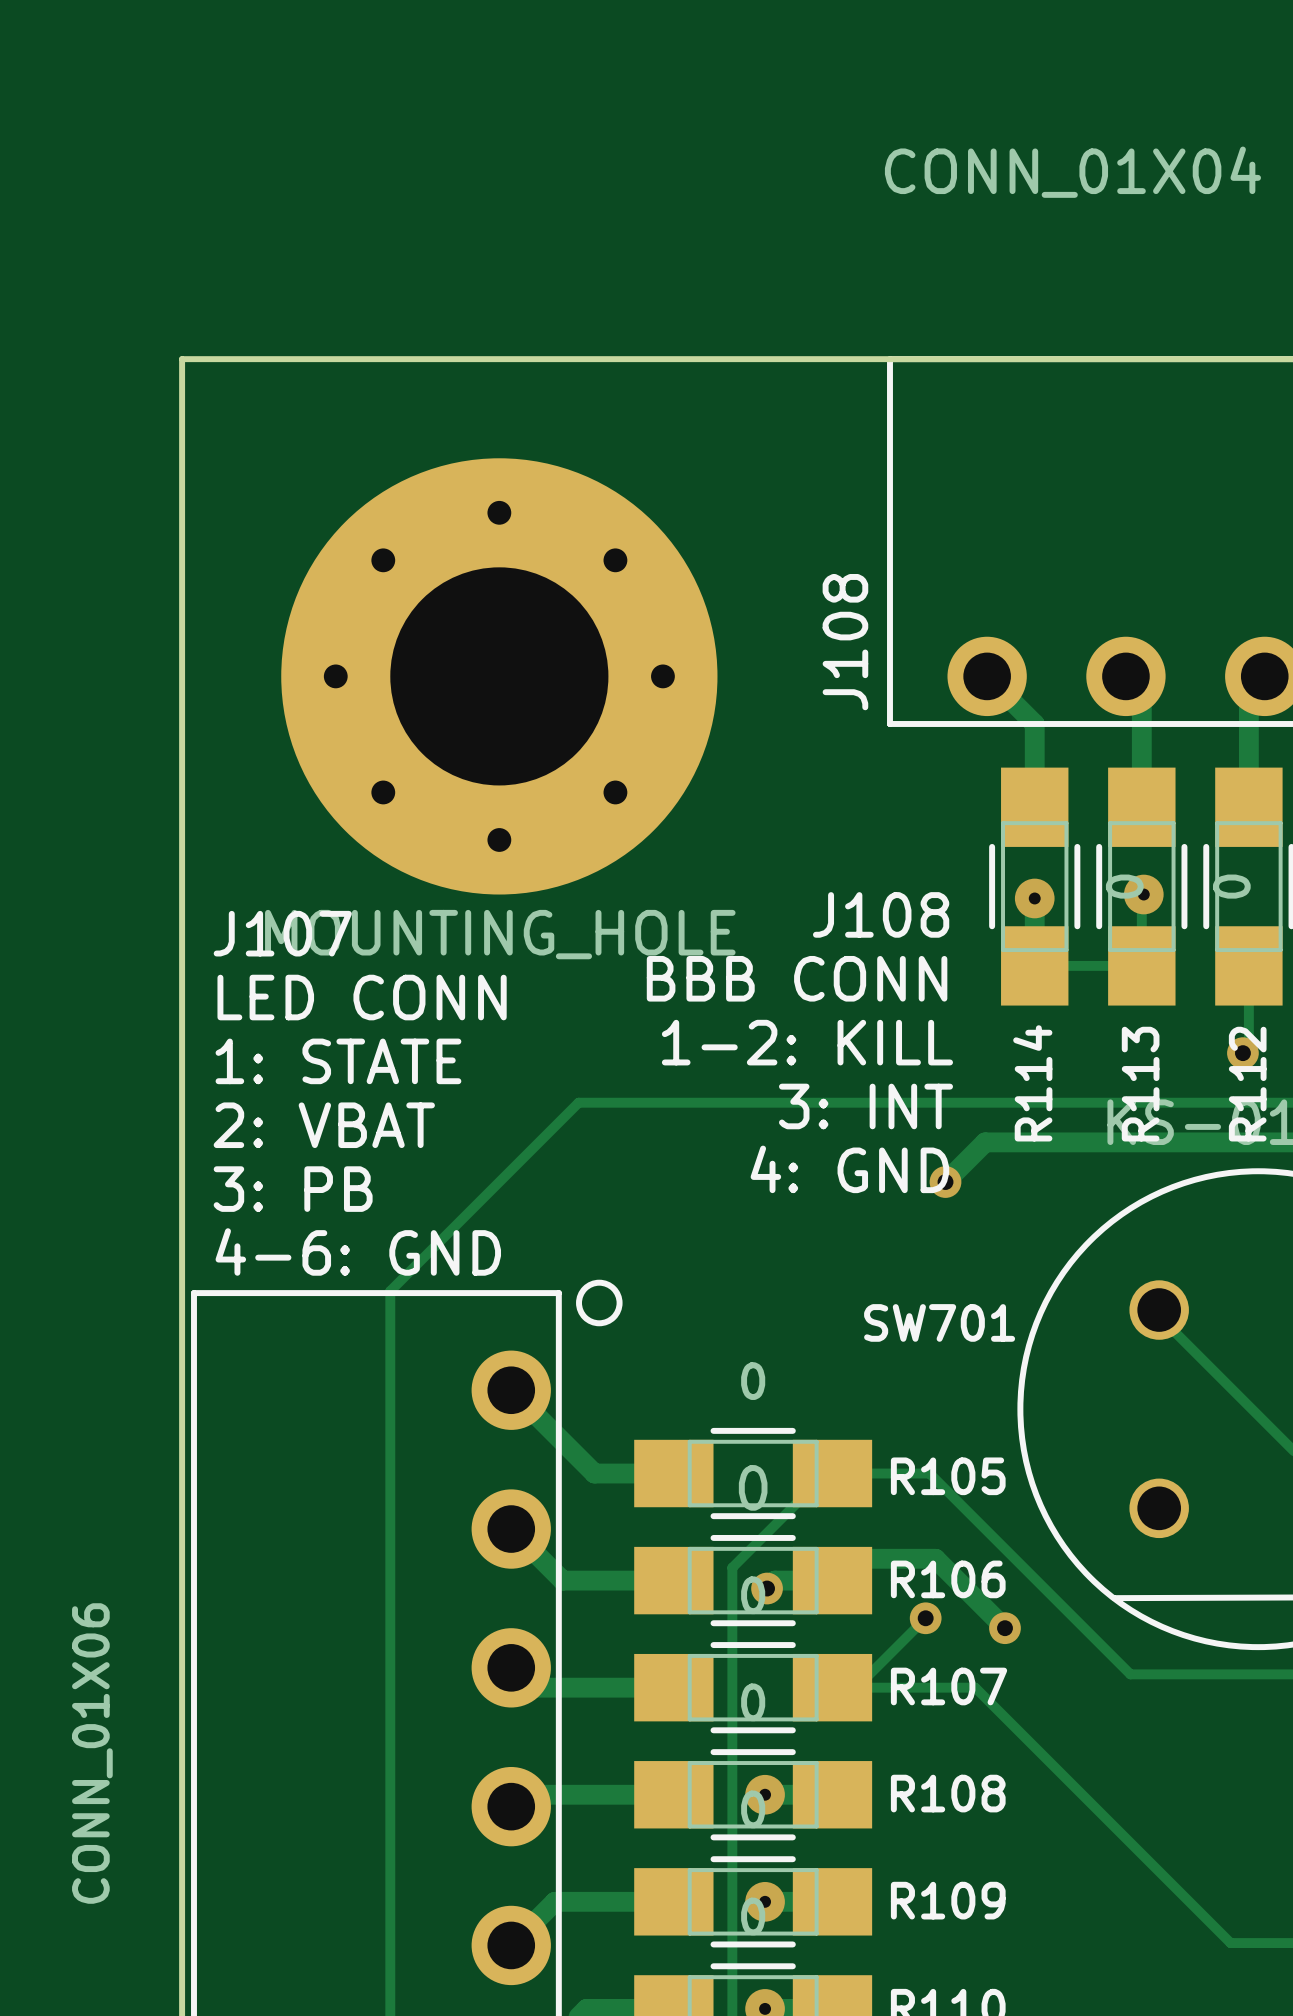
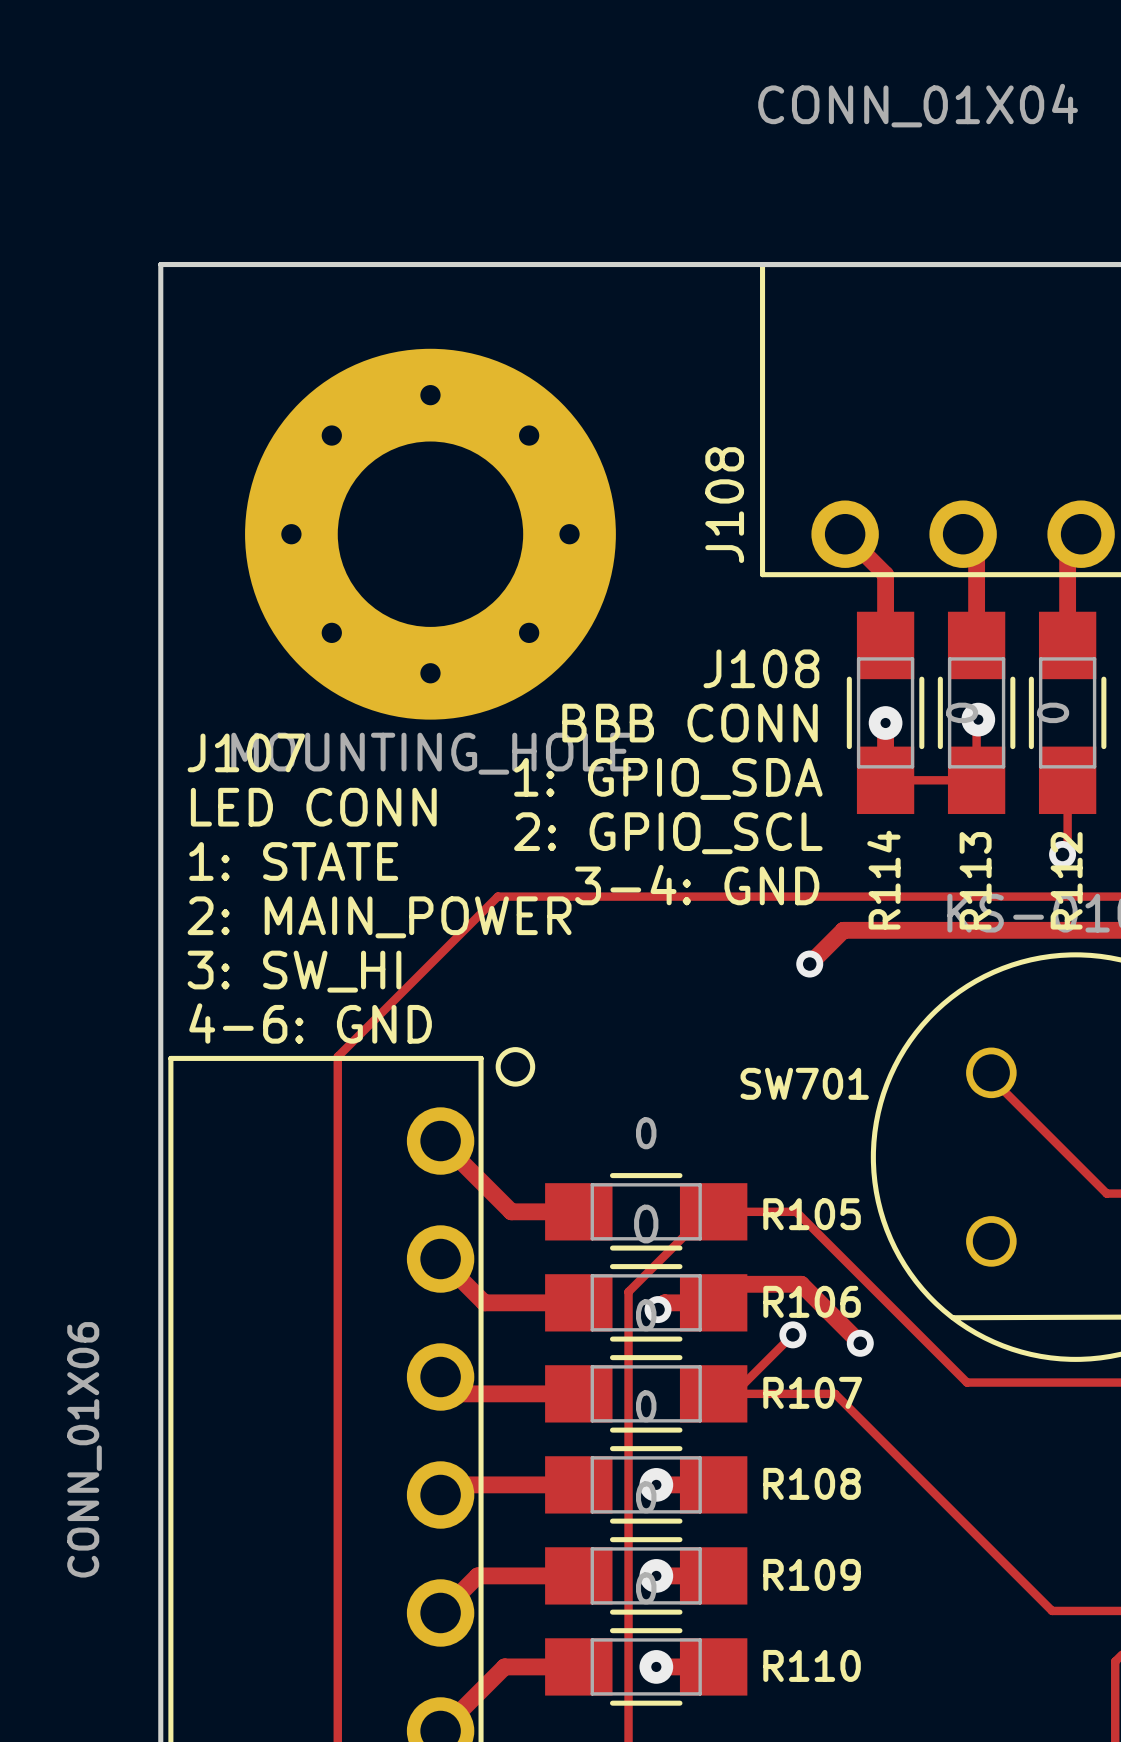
text: none -> J108 (761, 668)
text: J108 (881, 914) -> BBB CONN (690, 723)
text: BBB CONN (797, 978) -> 1: GPIO_SDA (668, 778)
text: 1-2: KILL (807, 1042) -> 2: GPIO_SCL (668, 833)
text: 3: INT (865, 1106) -> 3-4: GND (697, 885)
text: 2: VBAT (324, 1125) -> 2: MAIN_POWER (379, 917)
text: 4: GND (849, 1169) -> none
text: 3: PB (293, 1189) -> 3: SW_HI (294, 971)

